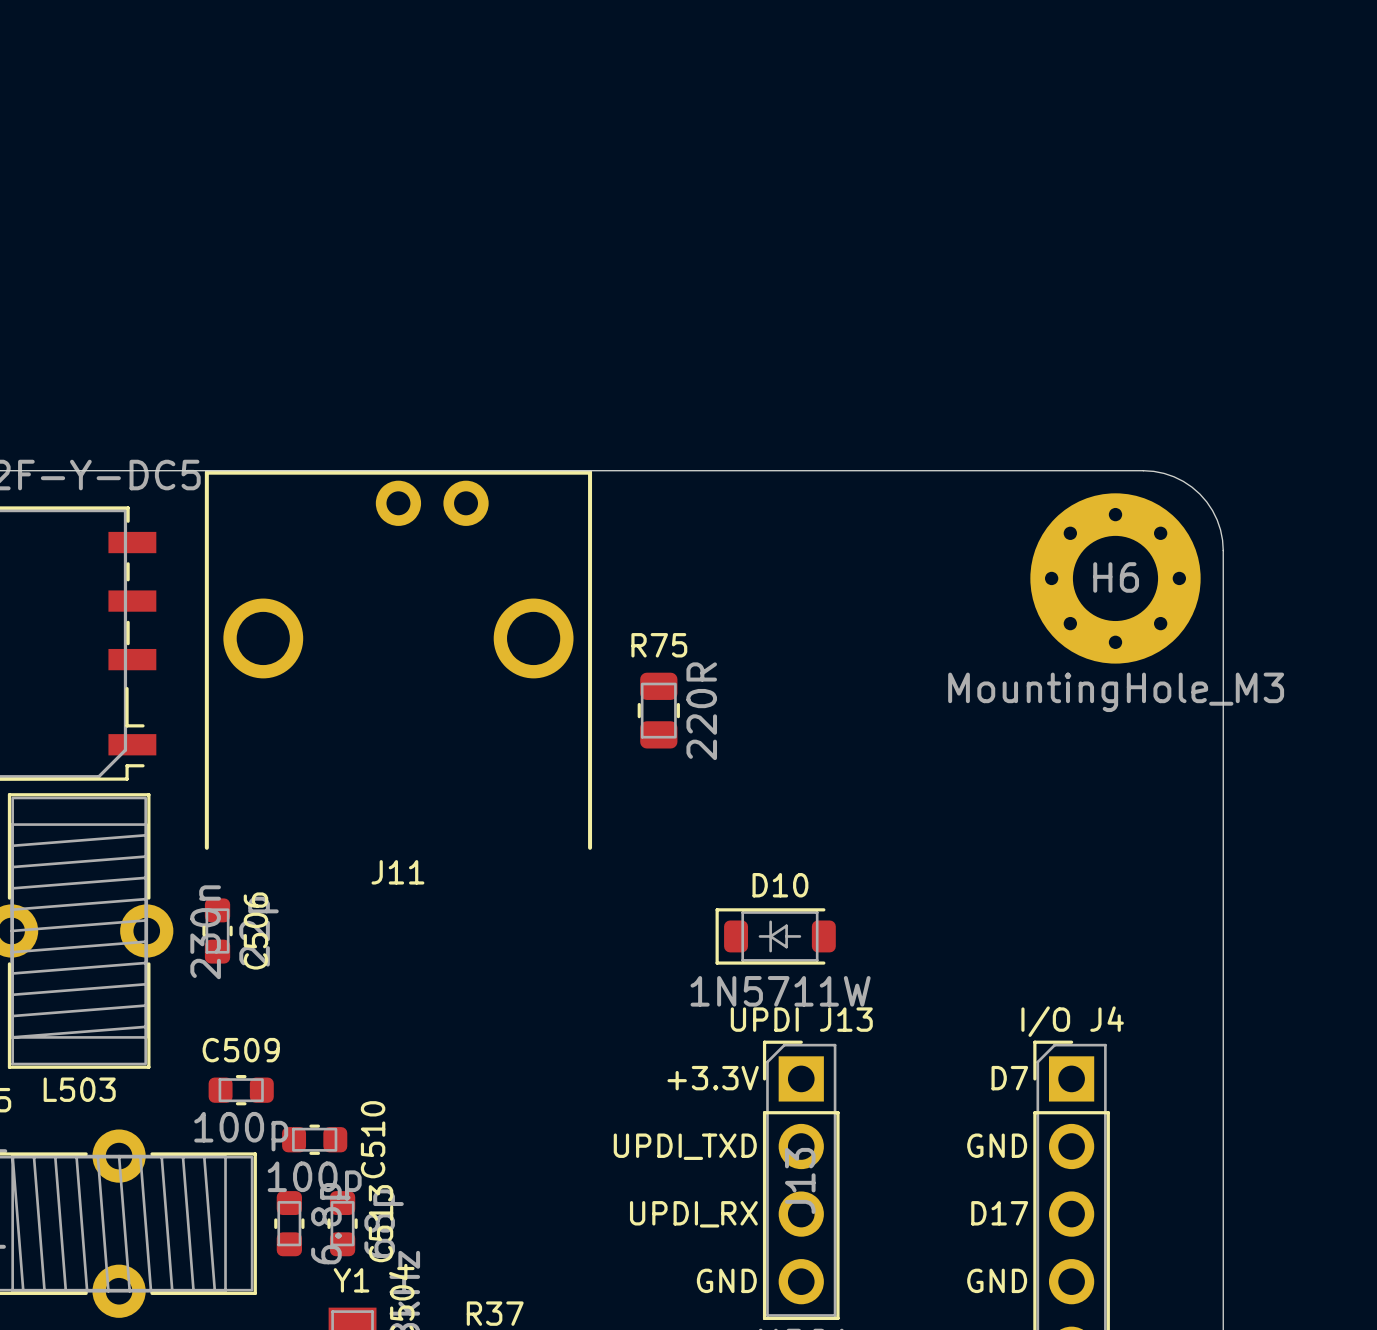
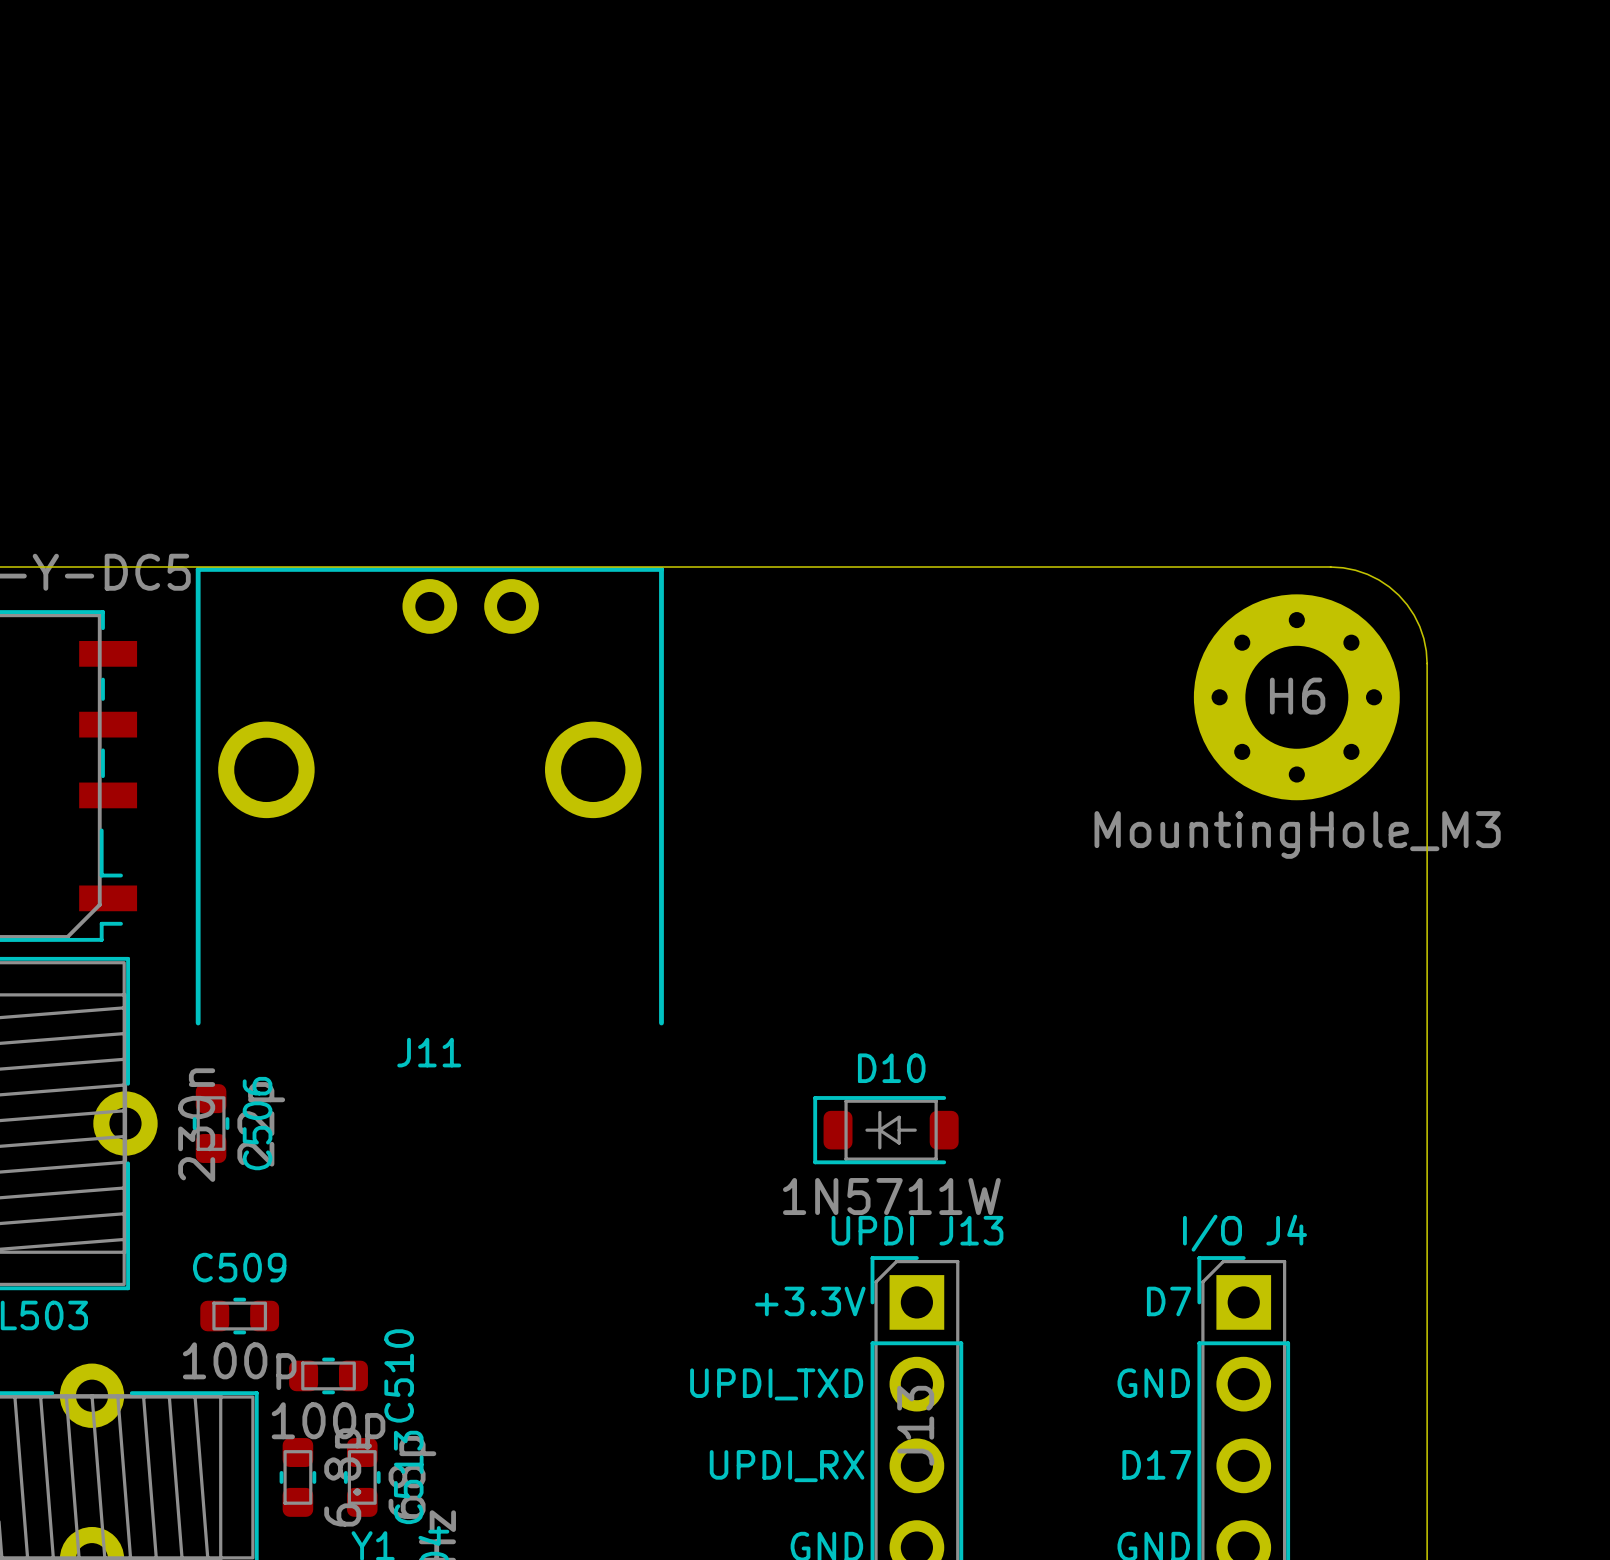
R75: 220R (658, 710) -> none

